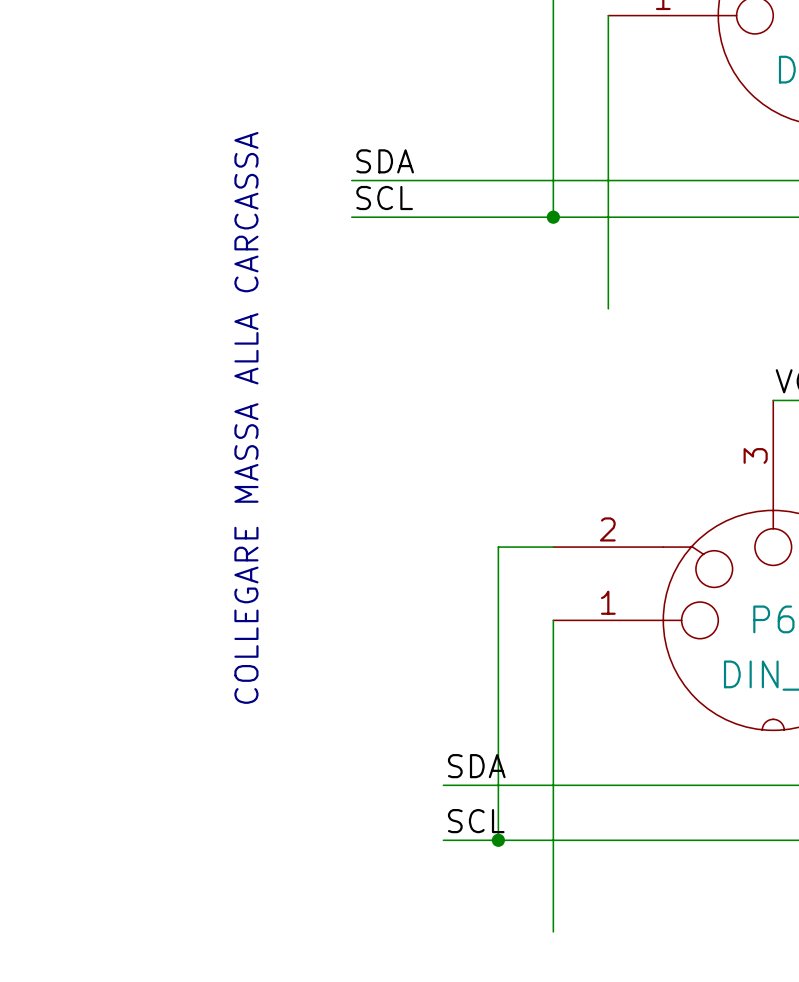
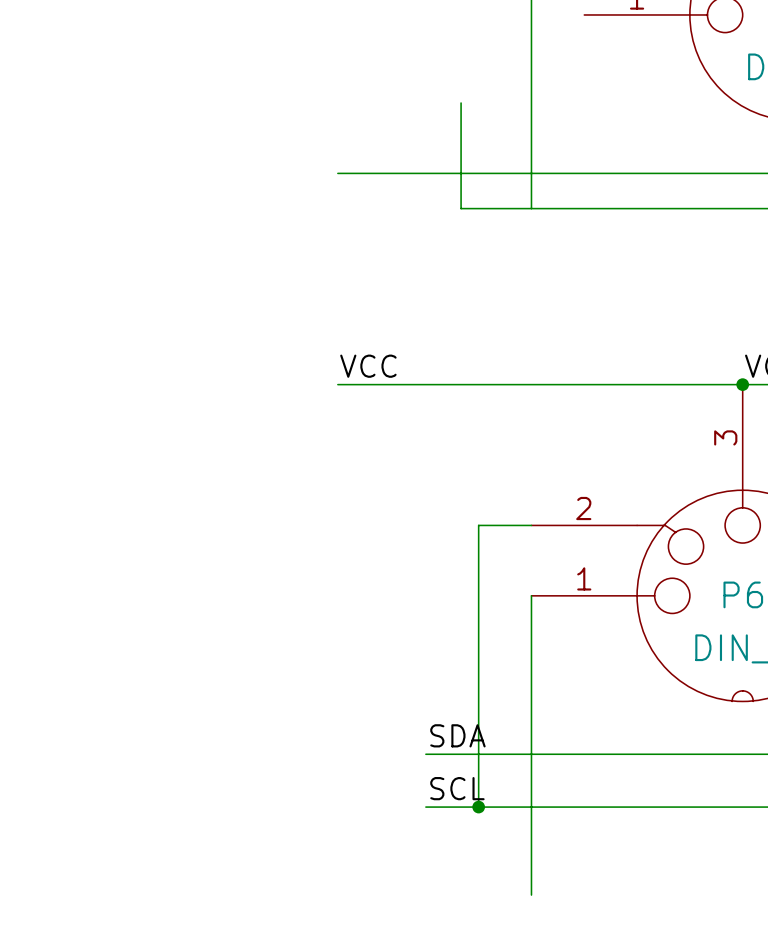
wire: (608, 15) (608, 308) -> none
label: SDA (385, 161) -> none
label: SCL (384, 198) -> none
wire: (351, 217) (480, 217) -> (461, 102) (461, 208)
junction: (553, 217) -> none
label: none -> VCC (368, 366)
wire: none -> (337, 384) (742, 384)
junction: none -> (742, 384)
text: COLLEGARE MASSA ALLA CARCASSA (246, 417) -> none

